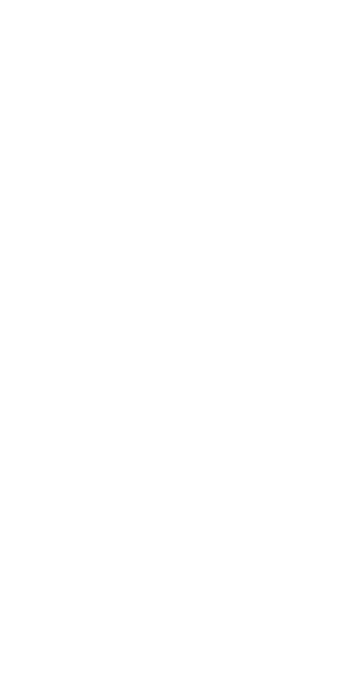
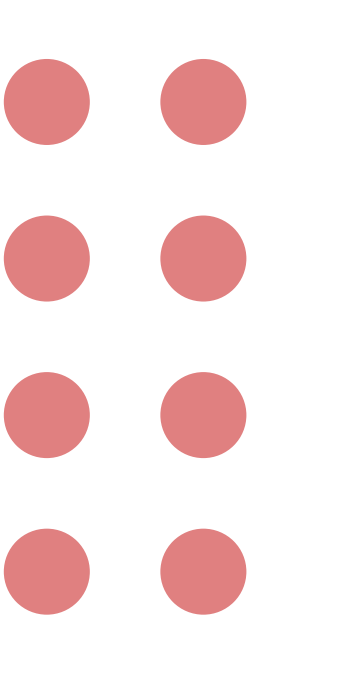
part: none -> (46, 101)
part: none -> (203, 101)
part: none -> (46, 258)
part: none -> (203, 258)
part: none -> (46, 415)
part: none -> (203, 415)
part: none -> (46, 571)
part: none -> (203, 571)

